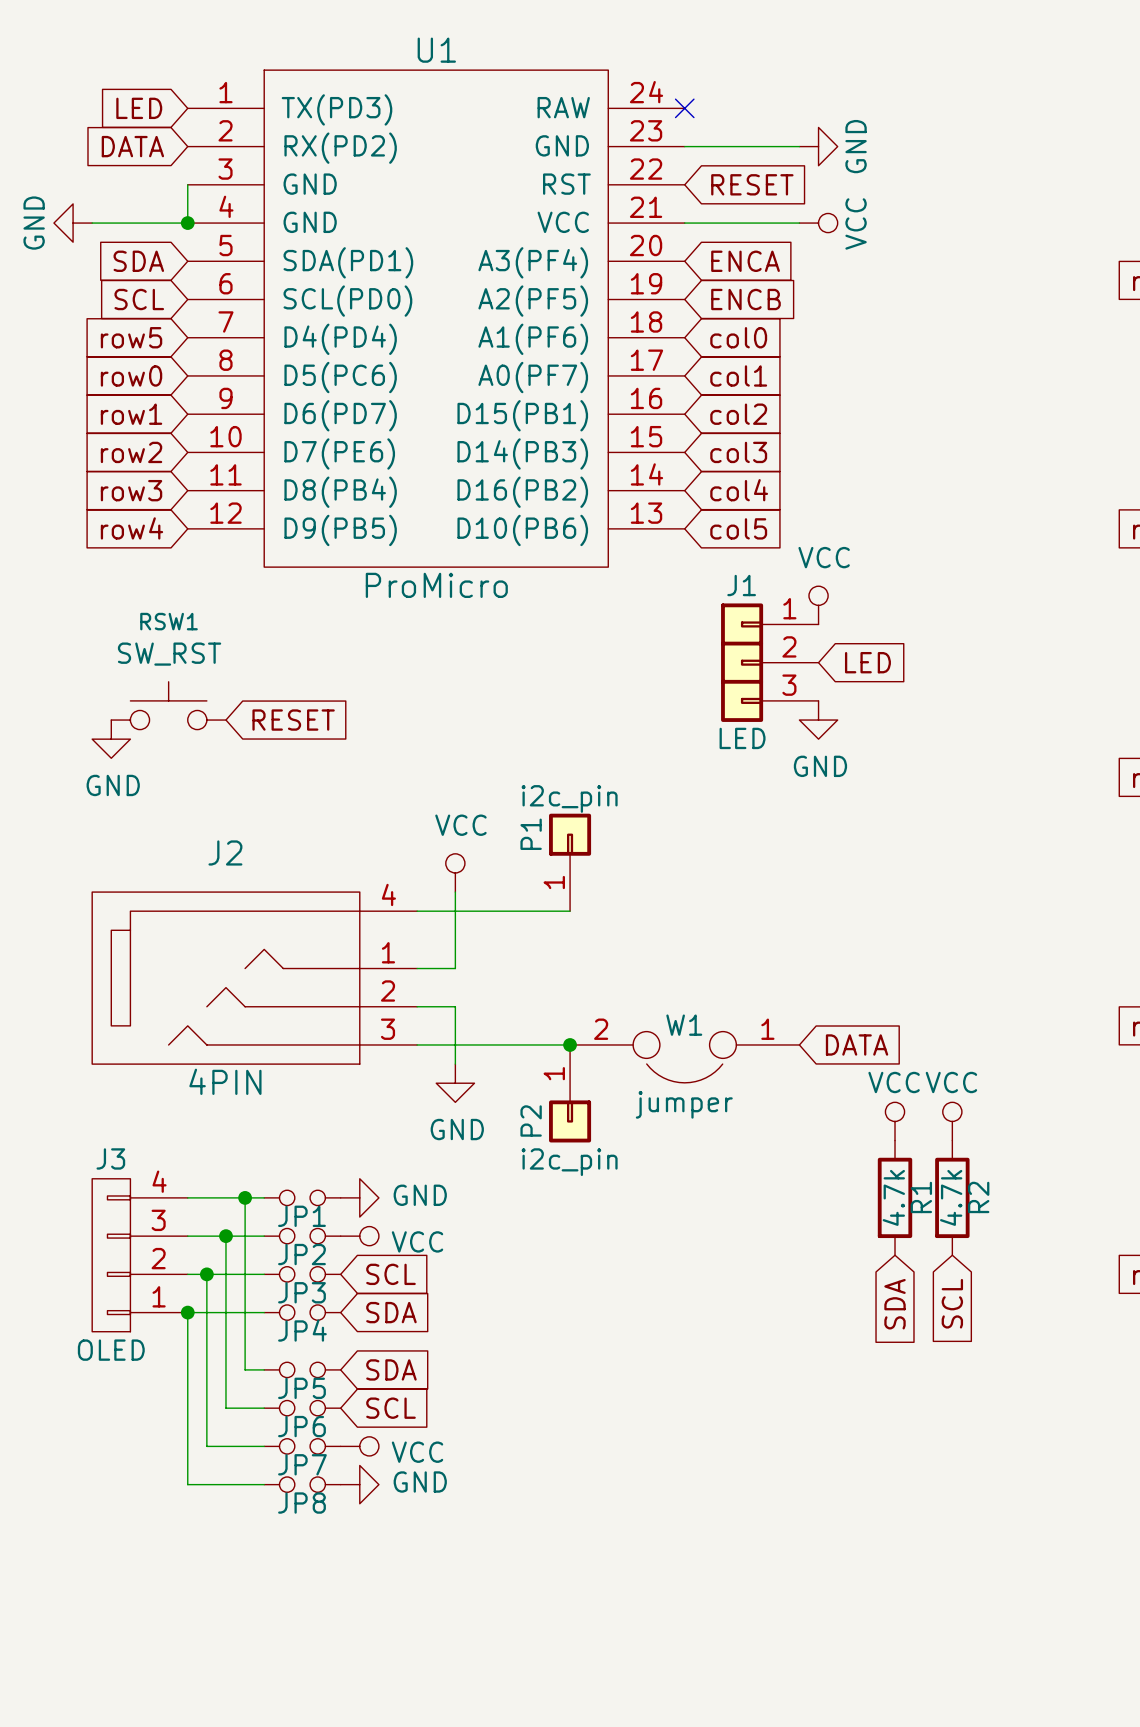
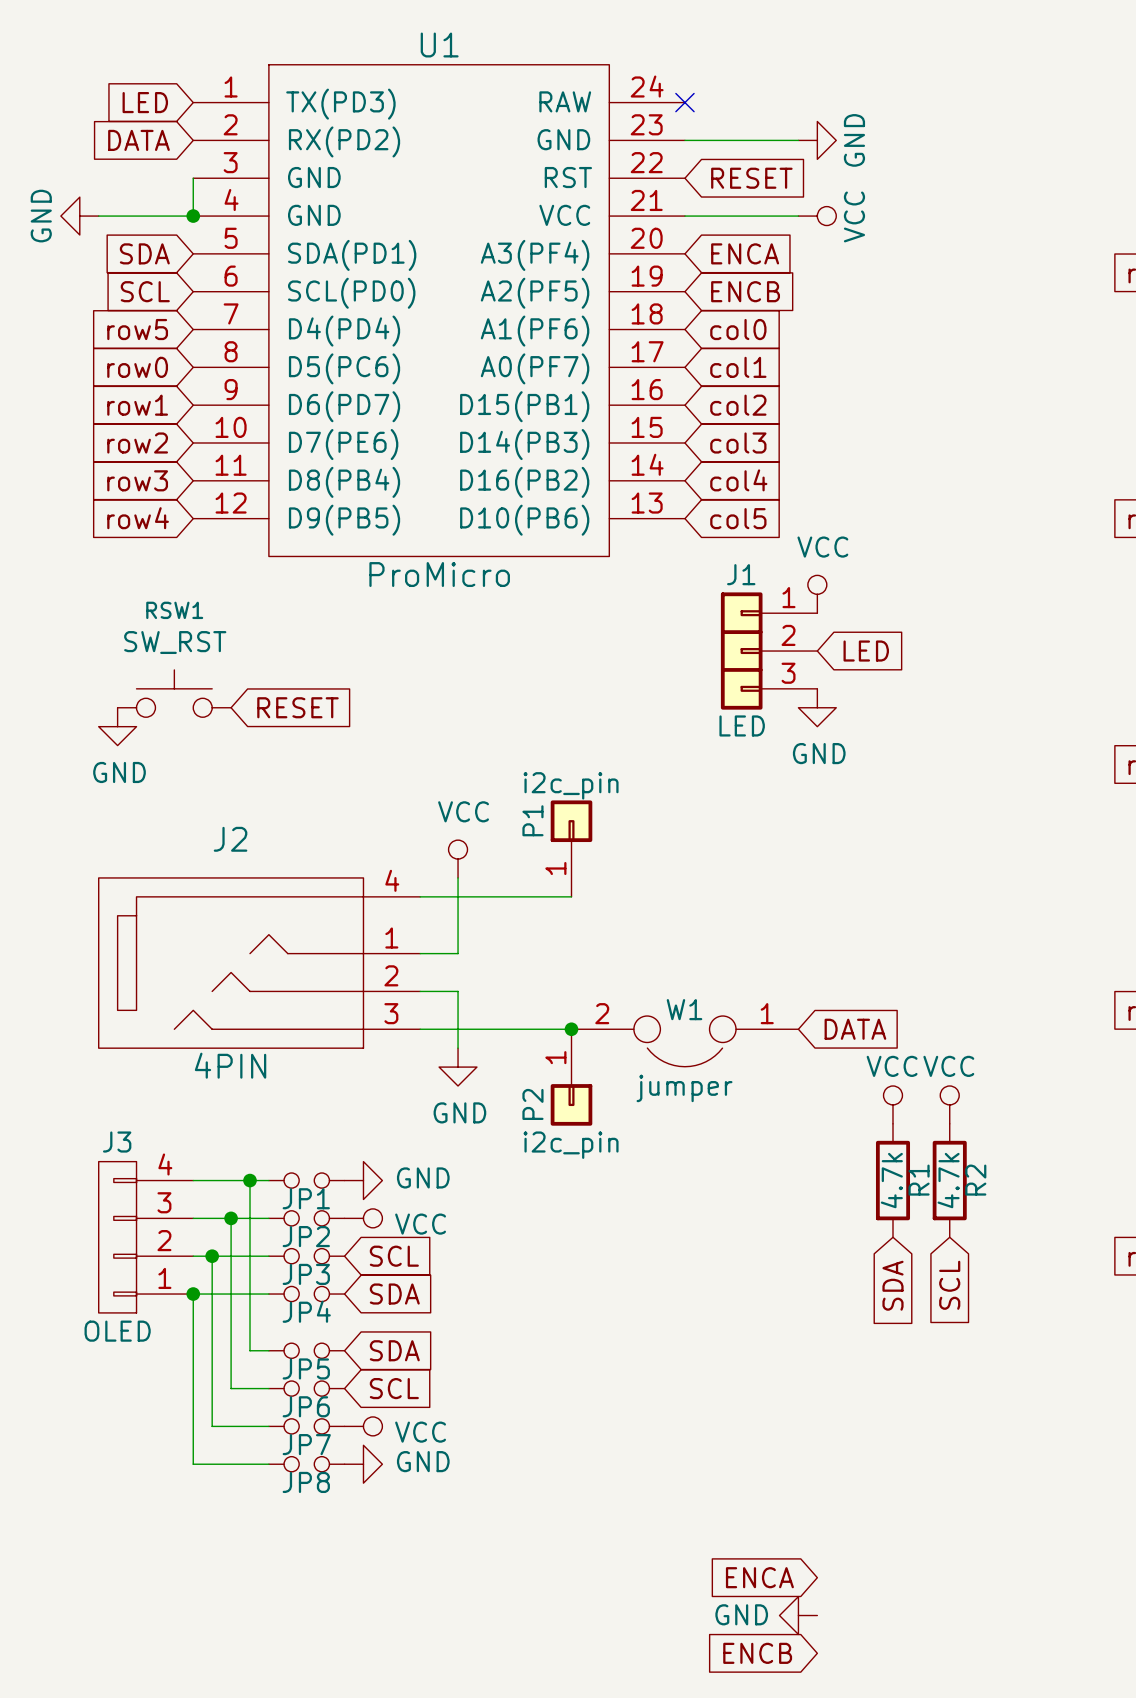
global label: none -> ENCA (759, 1577)
power symbol: none -> GND (798, 1615)
global label: none -> ENCB (757, 1653)

